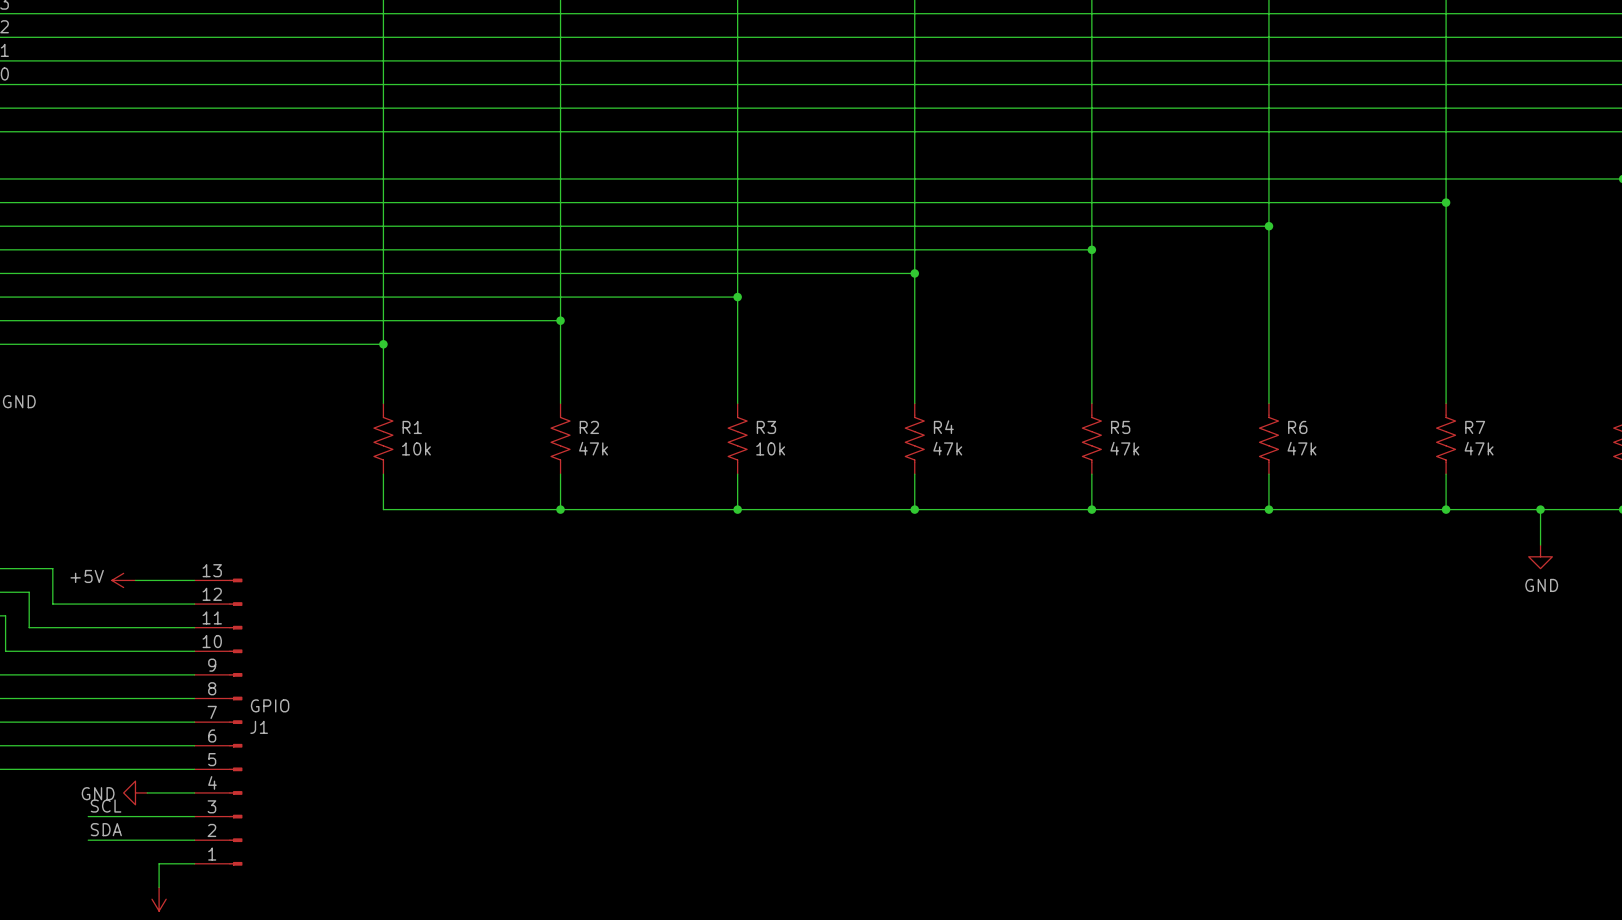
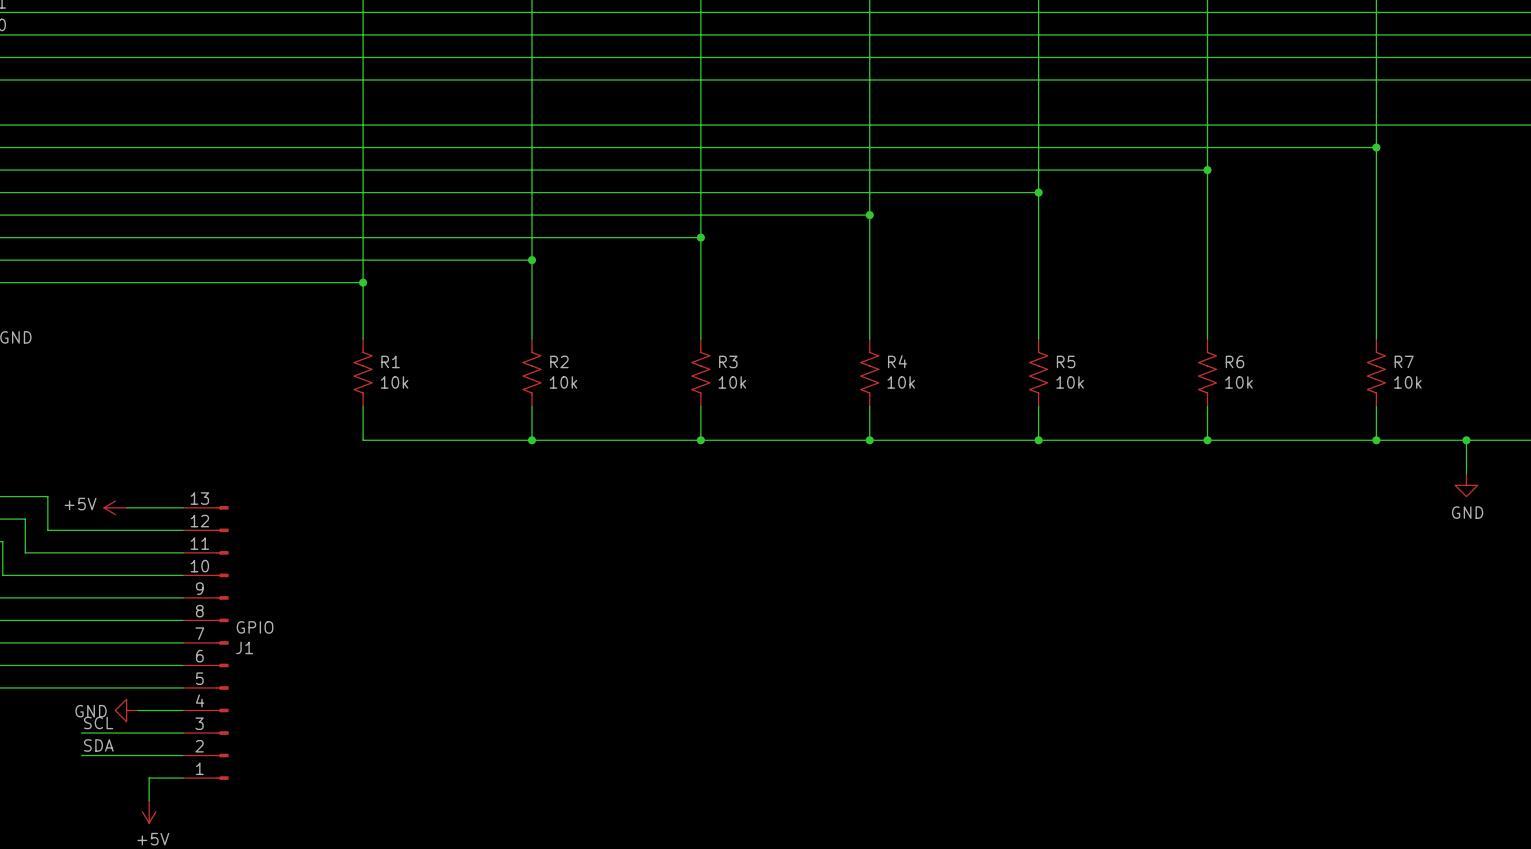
R2 value: 47k (593, 448) -> 10k (563, 382)
R4 value: 47k (947, 448) -> 10k (901, 382)
R5 value: 47k (1124, 448) -> 10k (1070, 382)
R6 value: 47k (1301, 448) -> 10k (1238, 382)
R7 value: 47k (1479, 448) -> 10k (1407, 382)

